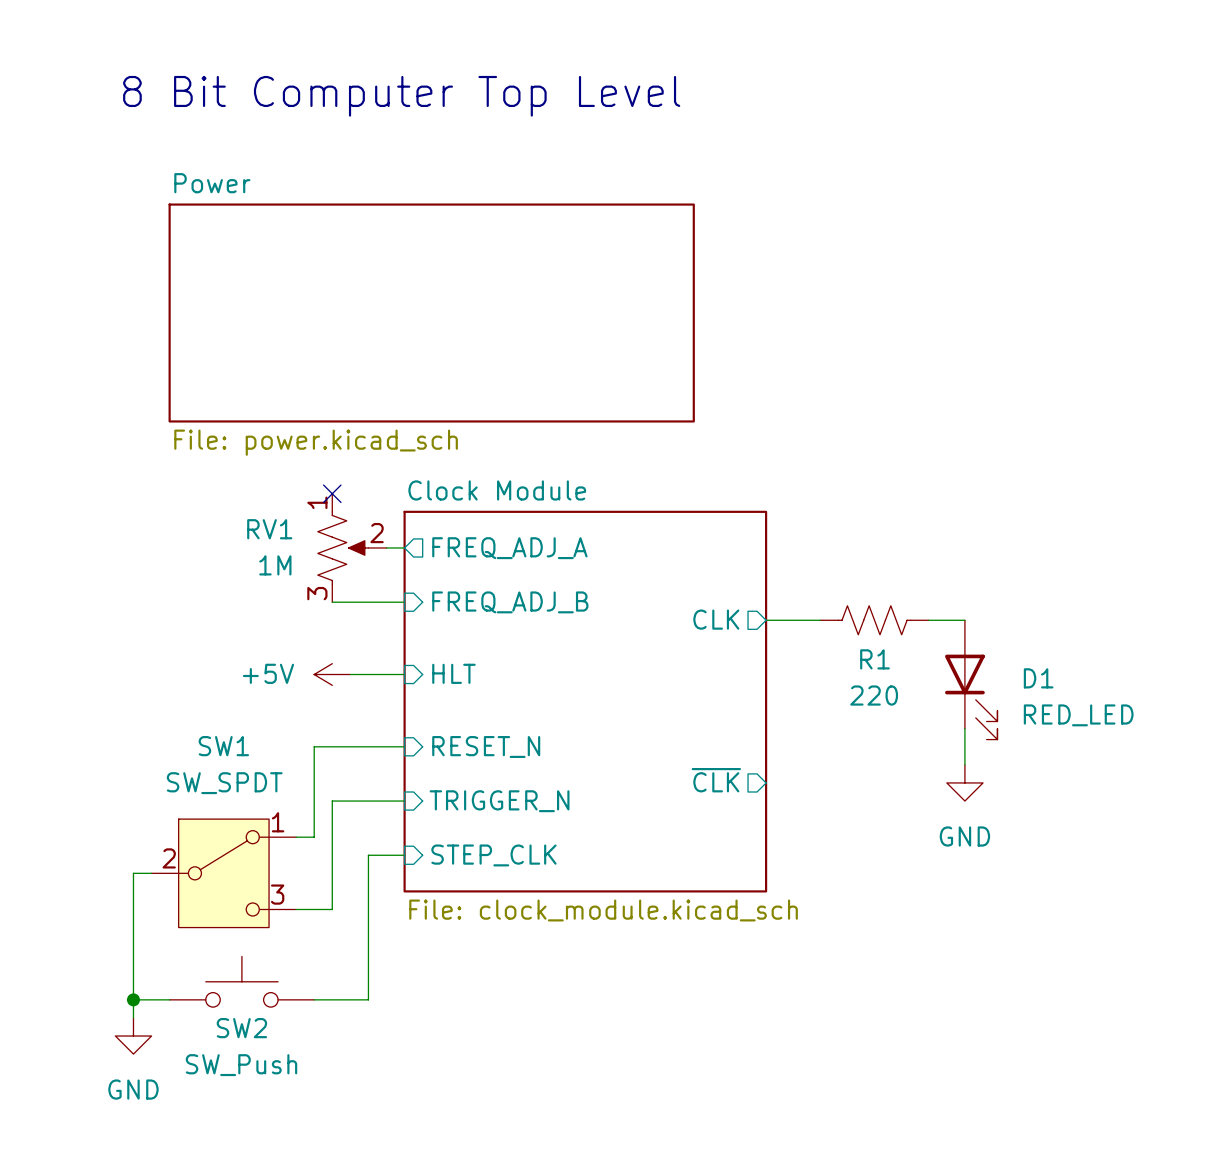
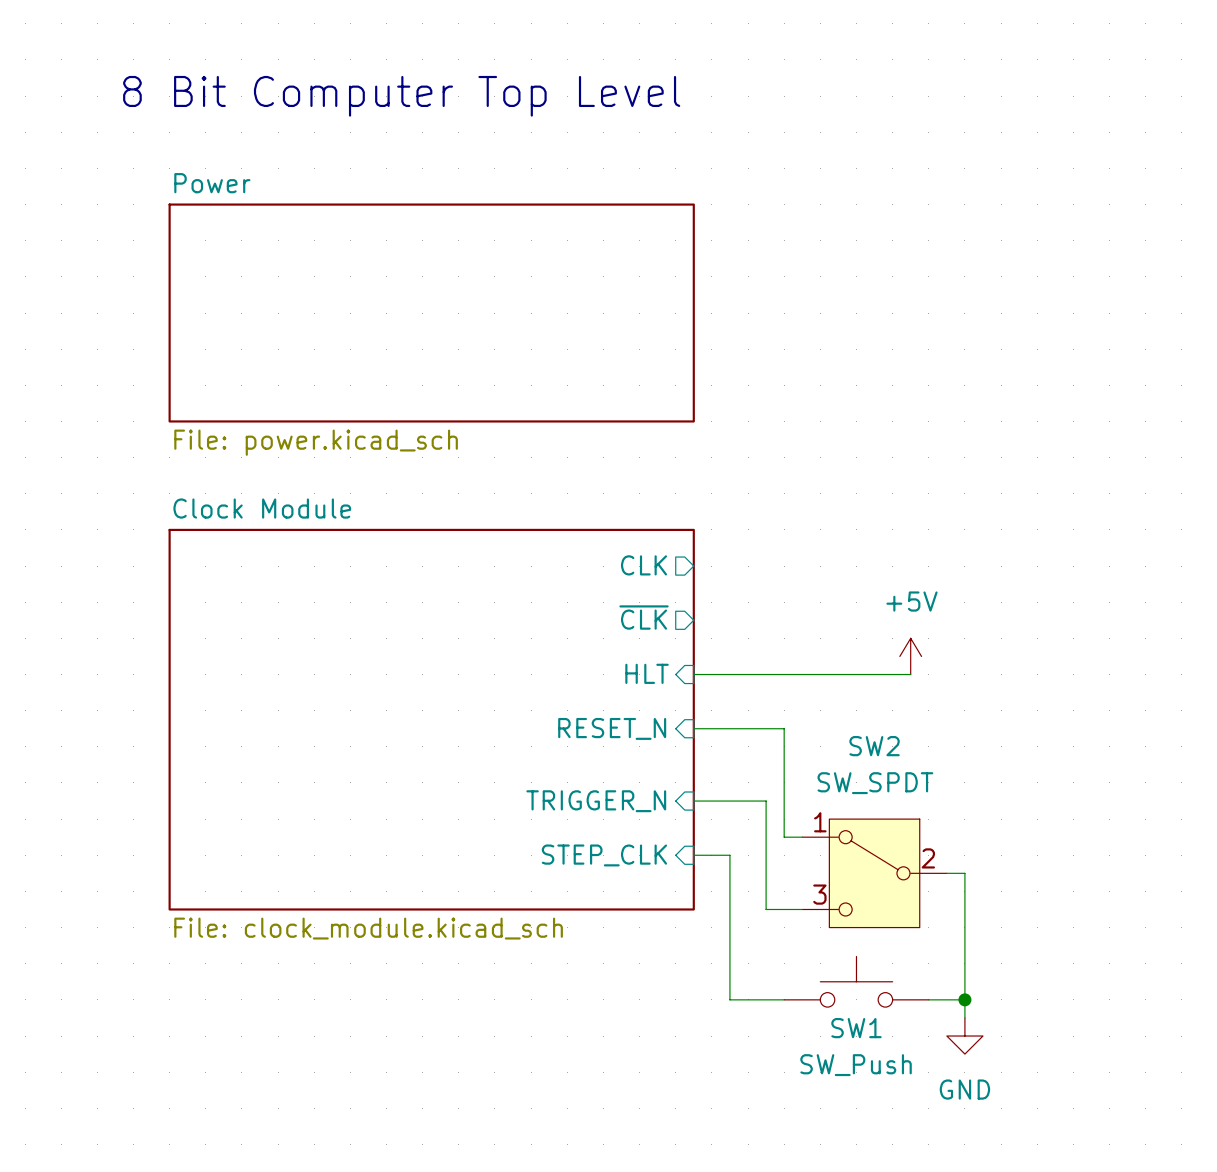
no-connect mark: (332, 493) -> none
RV1: 1M (352, 547) -> none
wire: (386, 547) (404, 547) -> none
sheet pin: FREQ_ADJ_A (509, 548) -> none
wire: (332, 602) (404, 602) -> none
sheet pin: FREQ_ADJ_B (510, 602) -> none
sheet pin position: CLK (716, 619) -> CLK (644, 565)
wire: (766, 620) (820, 620) -> none
R1: 220 (874, 620) -> none
wire: (928, 620) (964, 620) -> none
power symbol: none -> +5V (910, 656)
sheet pin rotation: 0° (453, 673) -> 180° (647, 673)
sheet pin position: HLT (453, 673) -> HLT (647, 673)
power symbol: +5V (332, 674) -> none
wire: (350, 674) (404, 674) -> none
wire: none -> (693, 674) (910, 674)
D1: RED_LED (971, 679) -> none
sheet Clock Module: File: clock_module.kicad_sch (585, 701) -> none
sheet Clock Module: none -> File: clock_module.kicad_sch (431, 719)
wire: none -> (693, 728) (784, 728) (784, 837) (802, 837)
wire: (964, 728) (964, 764) -> none
SW1 name position: SW1 (223, 746) -> SW1 (856, 1028)
wire: (404, 746) (314, 746) (314, 837) (296, 837) -> none
sheet pin rotation: 0° (486, 746) -> 180° (612, 728)
sheet pin position: ~{CLK} (716, 780) -> ~{CLK} (644, 617)
power symbol position: GND (964, 782) -> GND (964, 1036)
SW1 value: SW_SPDT (224, 783) -> SW_Push (856, 1065)
wire: (404, 801) (332, 801) (332, 909) (296, 909) -> none
sheet pin rotation: 0° (499, 801) -> 180° (596, 801)
wire: none -> (693, 801) (766, 801) (766, 909) (802, 909)
SW1 symbol: [151, 819, 297, 928] -> [784, 956, 929, 1008]
wire: (404, 855) (368, 855) (368, 999) (314, 999) -> none
sheet pin rotation: 0° (493, 855) -> 180° (604, 855)
wire: none -> (693, 855) (729, 855) (729, 999) (784, 999)
wire: (151, 873) (133, 873) (133, 1017) -> none
wire: none -> (946, 873) (964, 873) (964, 1017)
SW2 symbol: [169, 956, 315, 1008] -> [802, 819, 947, 928]
wire: (133, 999) (169, 999) -> none
junction: (133, 999) -> none
wire: none -> (928, 999) (964, 999)
junction: none -> (964, 999)
SW2 name position: SW2 (241, 1028) -> SW2 (874, 746)
power symbol: GND (133, 1036) -> none
SW2 value: SW_Push (241, 1065) -> SW_SPDT (875, 783)

